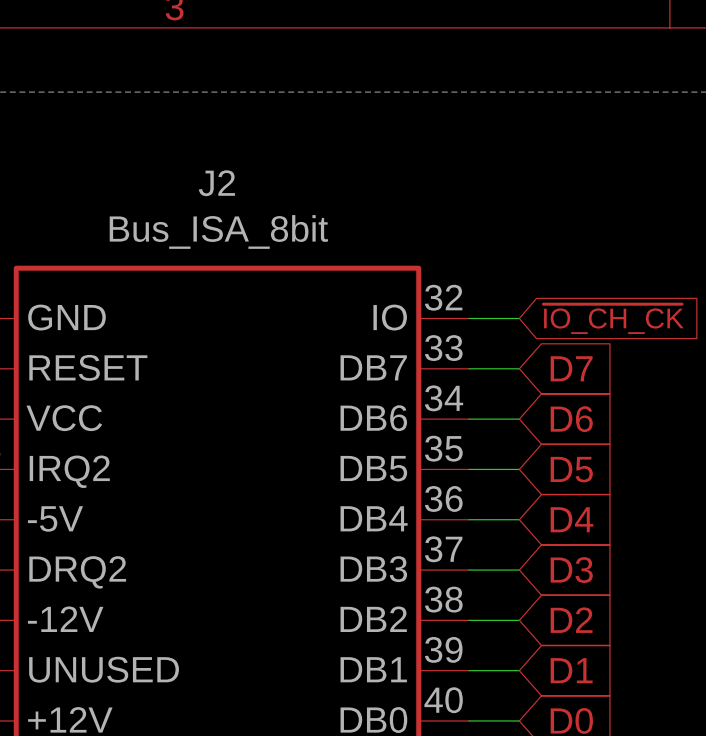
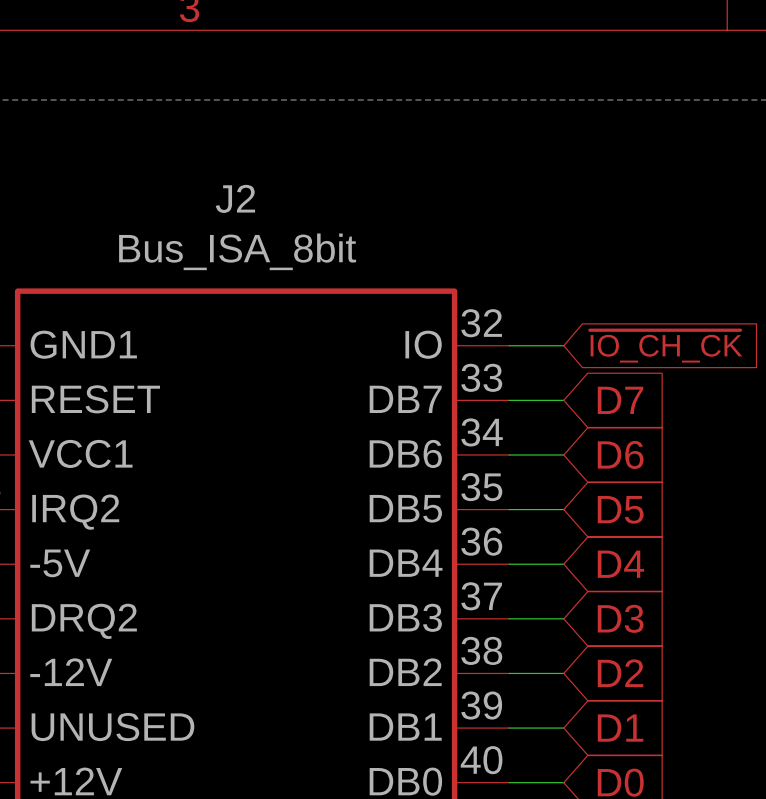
J2 pin name: GND (66, 317) -> GND1 (83, 344)
J2 pin name: VCC (64, 418) -> VCC1 (80, 453)

